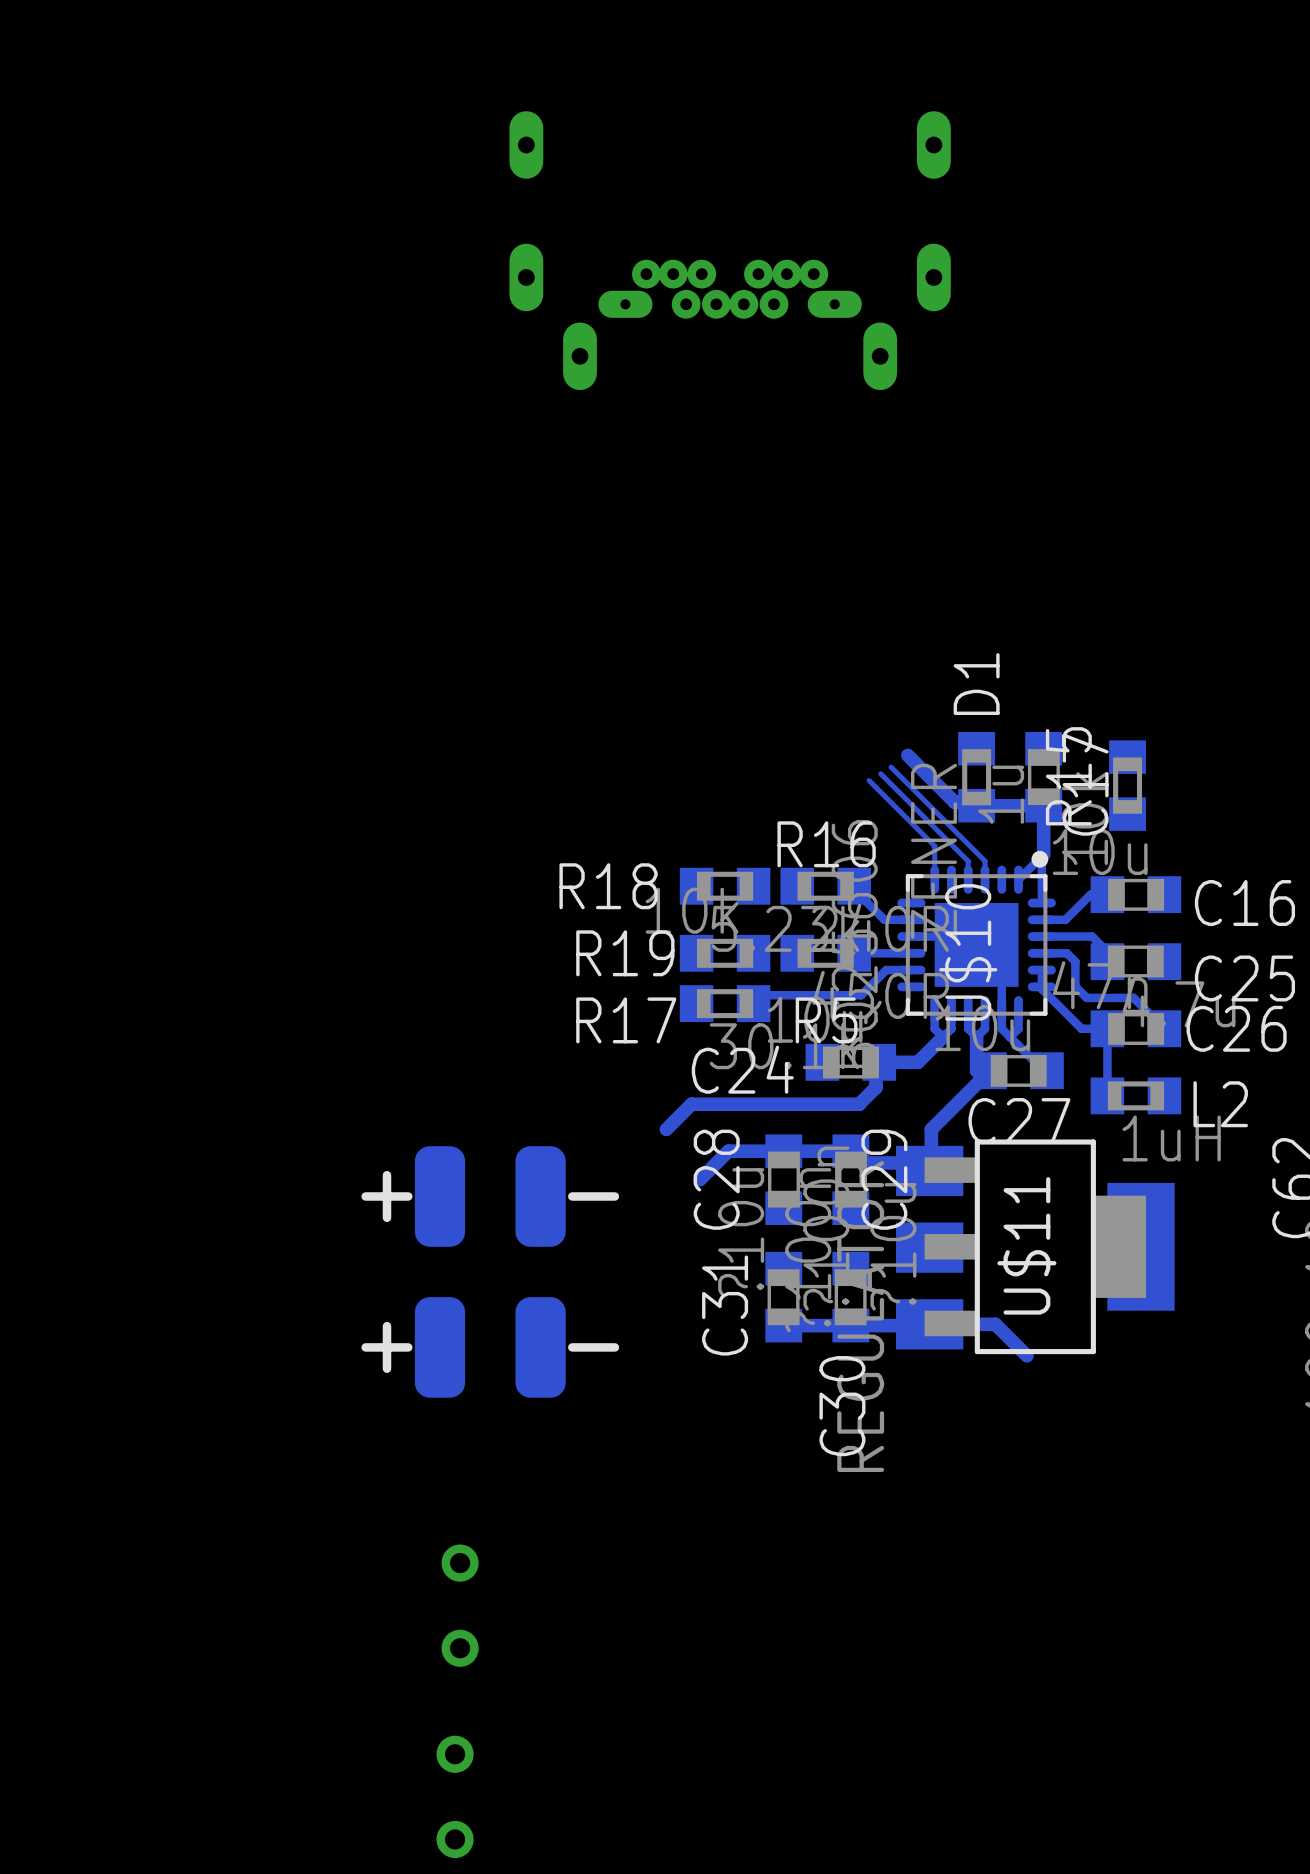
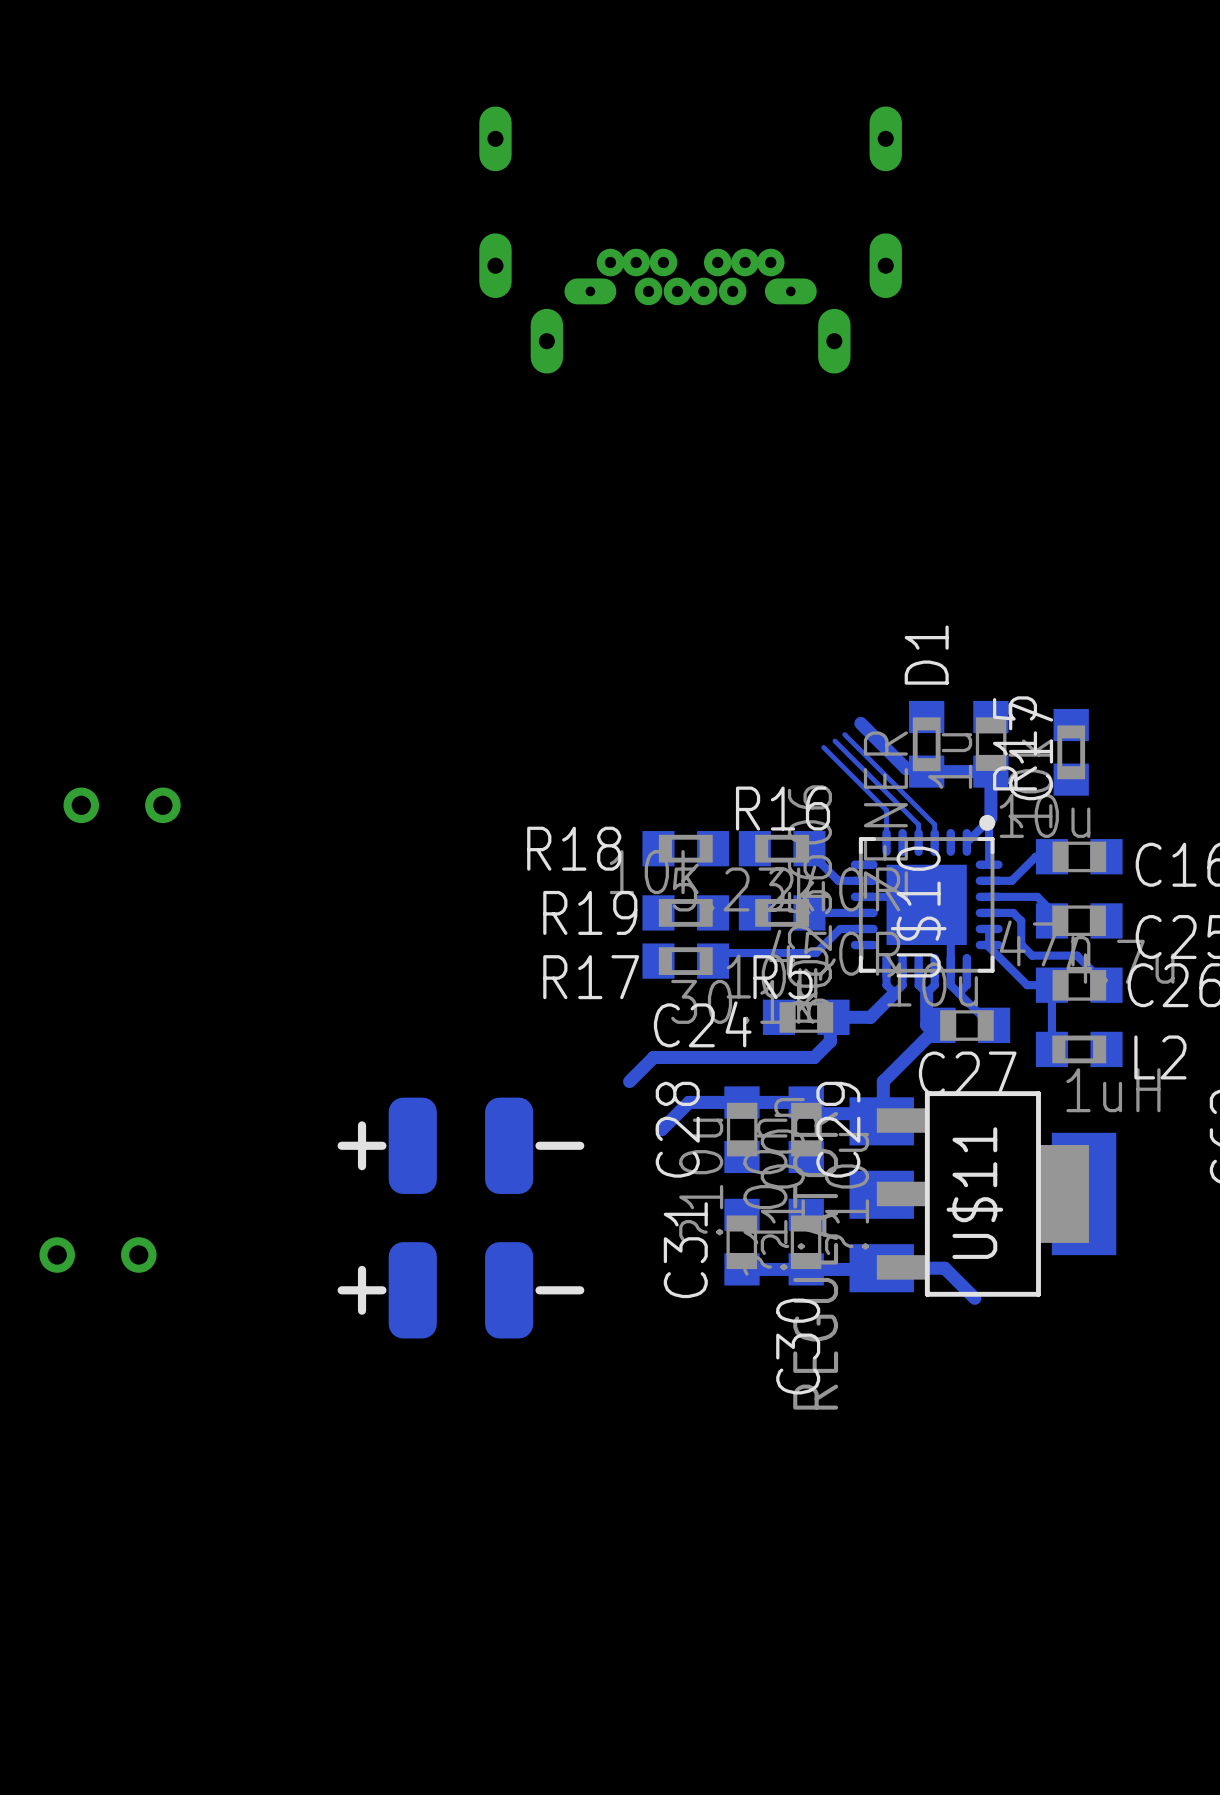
part: none -> (122, 805)
part: none -> (98, 1254)
part: (460, 1605) -> none
part: (455, 1796) -> none

